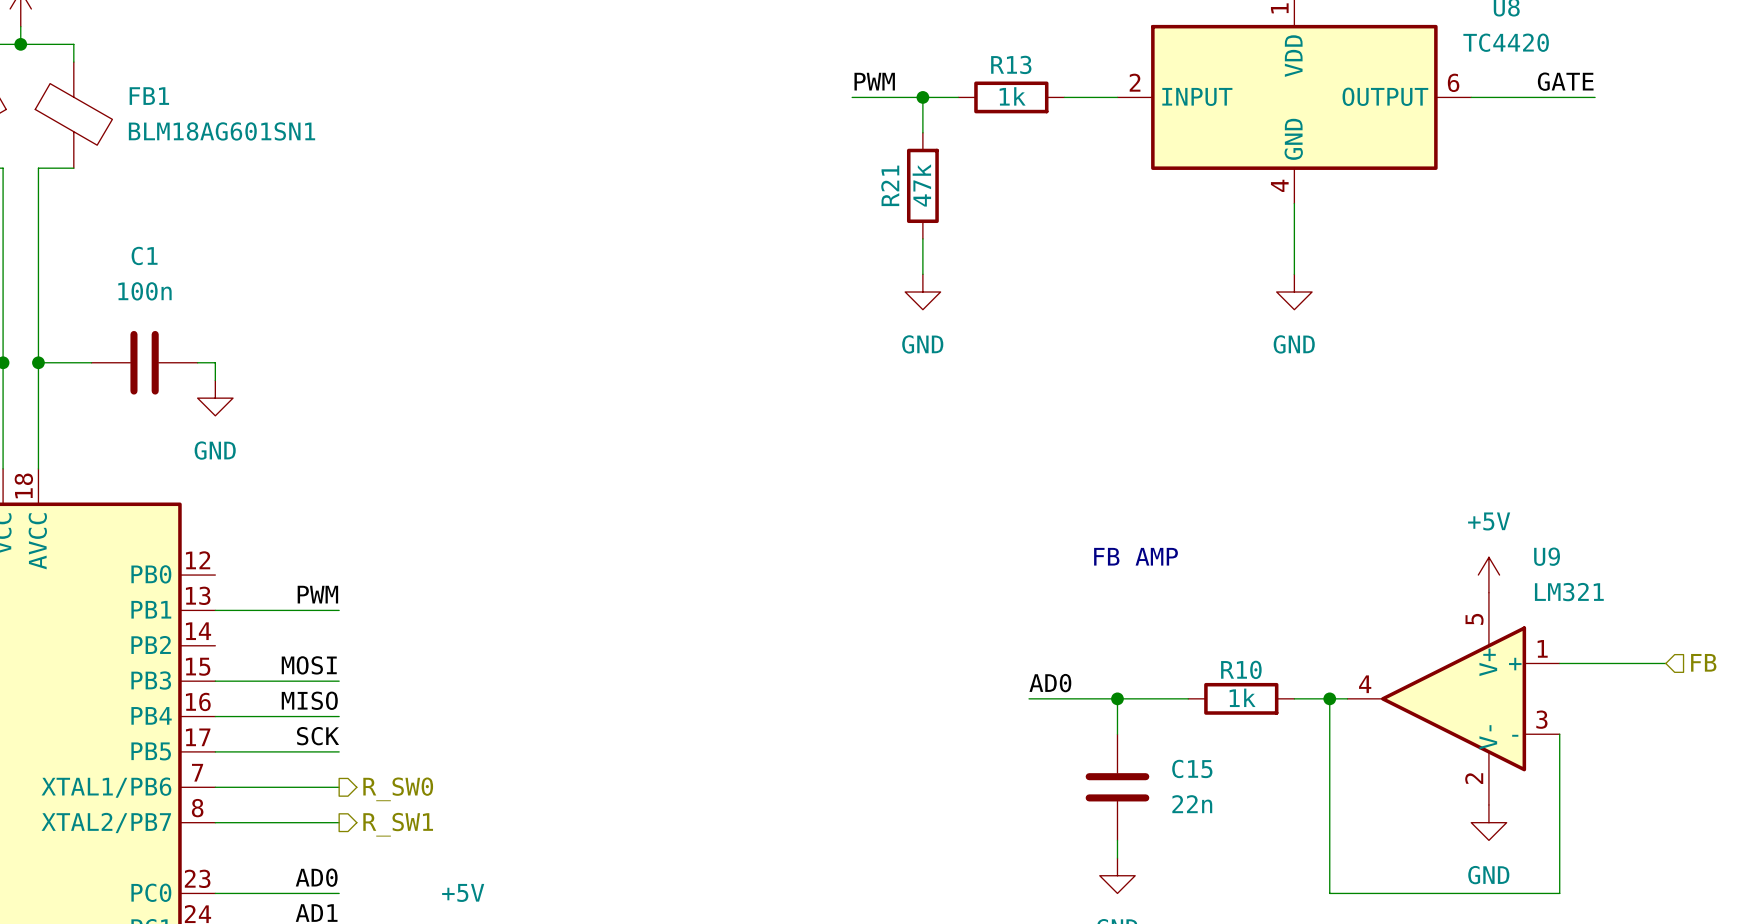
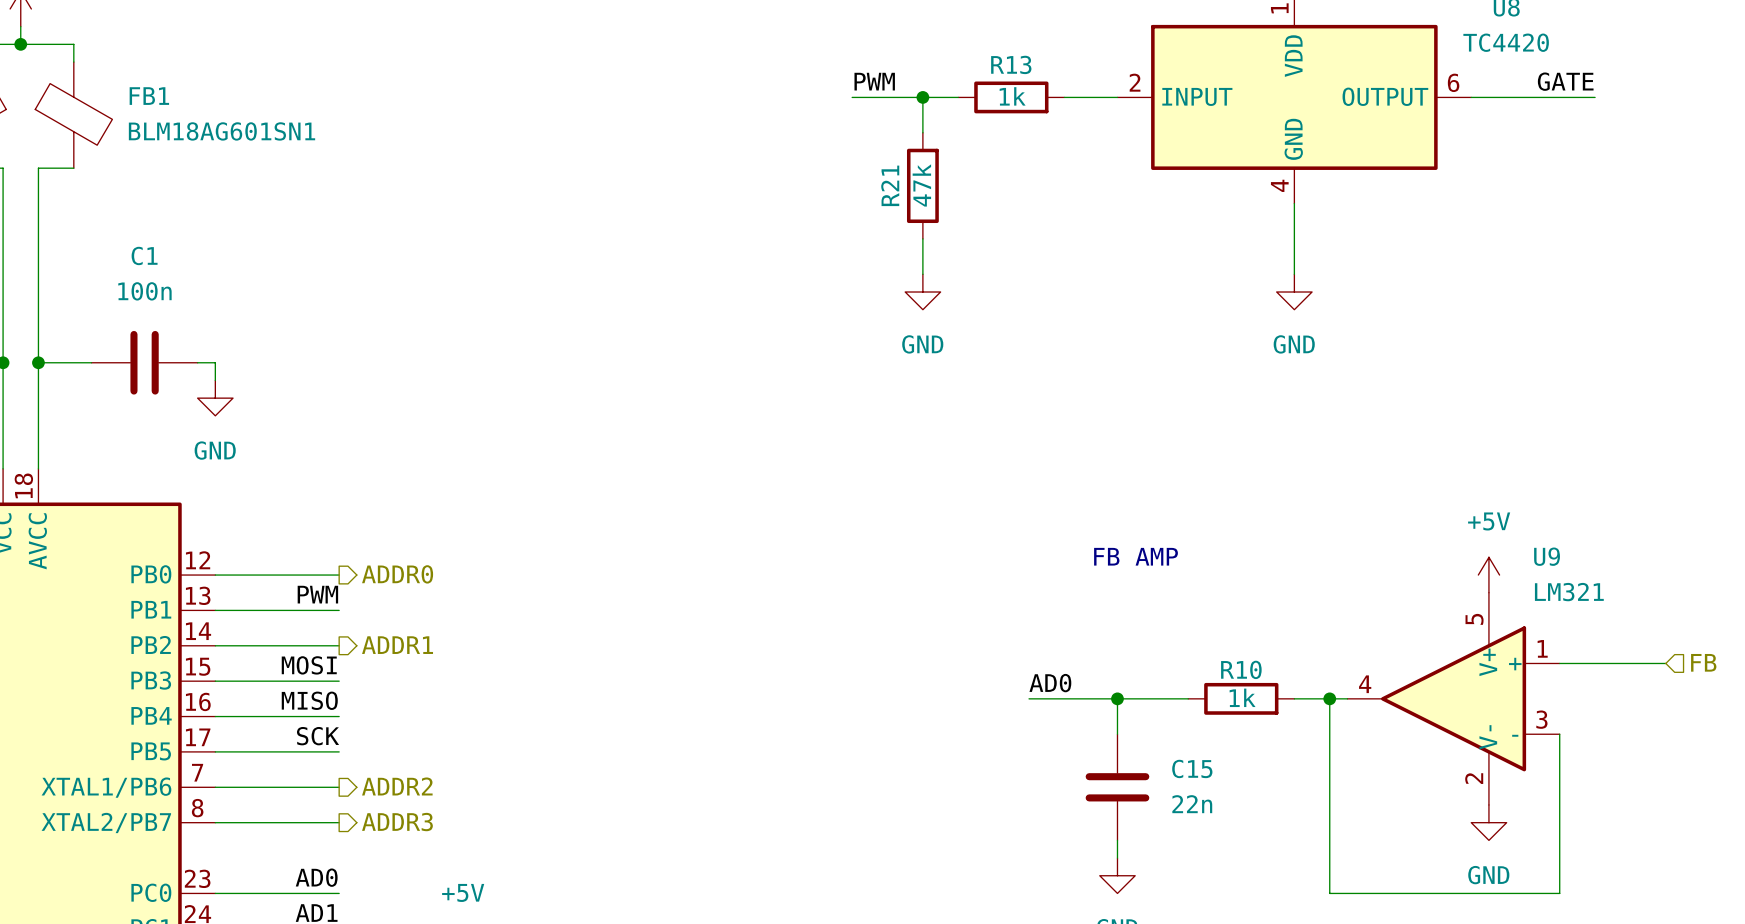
hierarchical label: none -> ADDR0 (397, 574)
wire: none -> (215, 575) (339, 575)
wire: none -> (215, 645) (339, 645)
hierarchical label: none -> ADDR1 (397, 645)
hierarchical label: R_SW0 (398, 789) -> ADDR2 (397, 786)
hierarchical label: R_SW1 (398, 824) -> ADDR3 (397, 822)

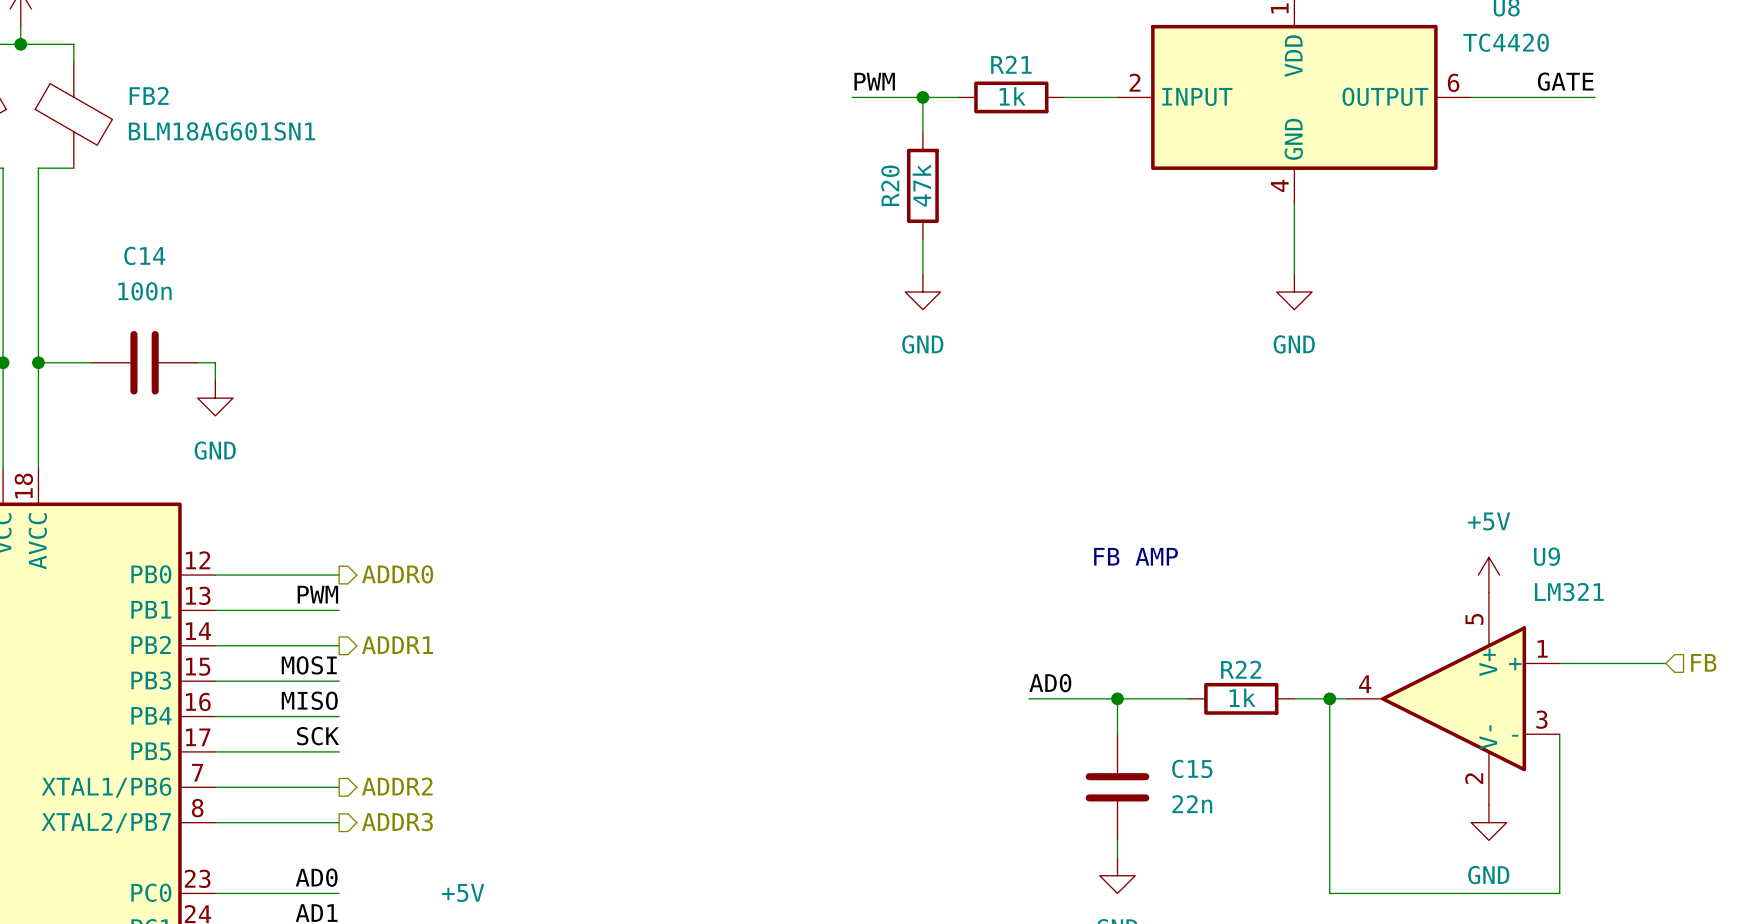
R13 name: R13 (1011, 64) -> R21 (1011, 64)
FB1 name: FB1 (149, 96) -> FB2 (149, 95)
R21 name: R21 (890, 185) -> R20 (890, 185)
C1 name: C1 (144, 255) -> C14 (144, 255)
R10 name: R10 (1241, 669) -> R22 (1241, 669)

